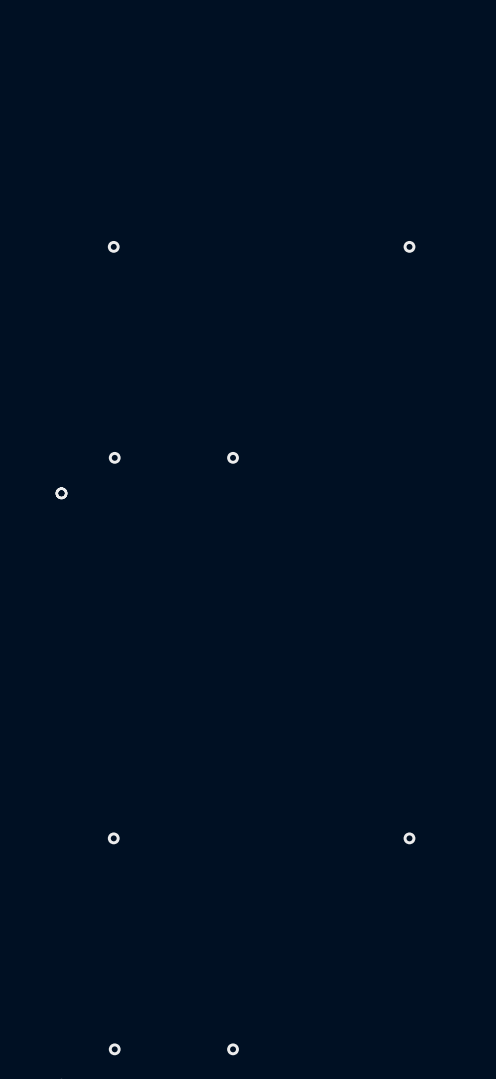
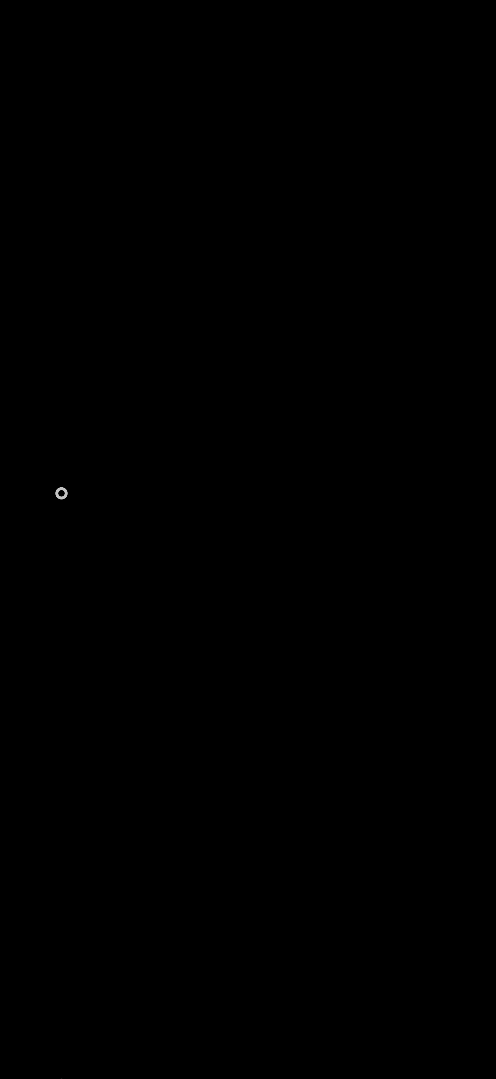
via: (113, 246) -> none
via: (409, 246) -> none
via: (114, 457) -> none
via: (233, 457) -> none
via: (113, 838) -> none
via: (409, 838) -> none
via: (114, 1049) -> none
via: (233, 1049) -> none

